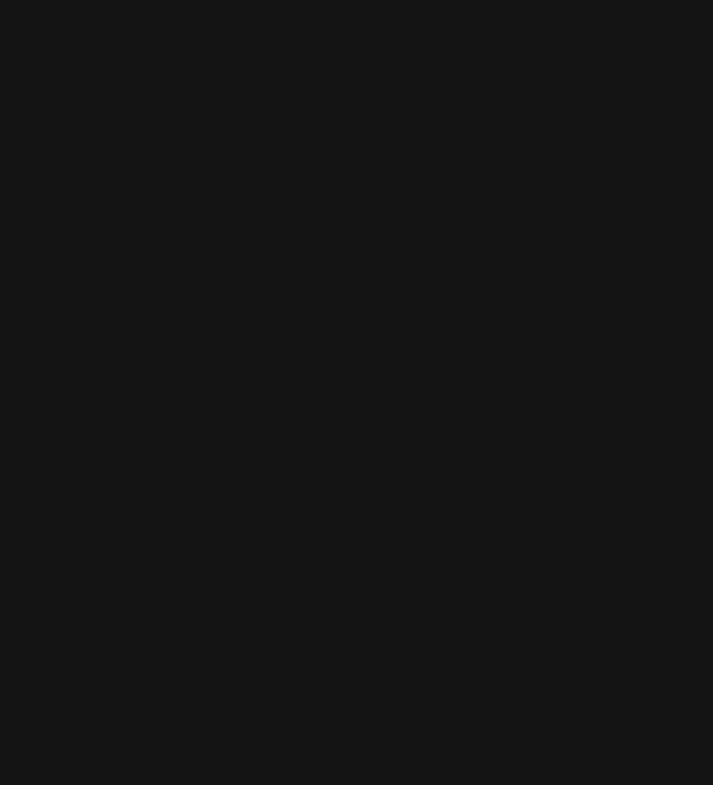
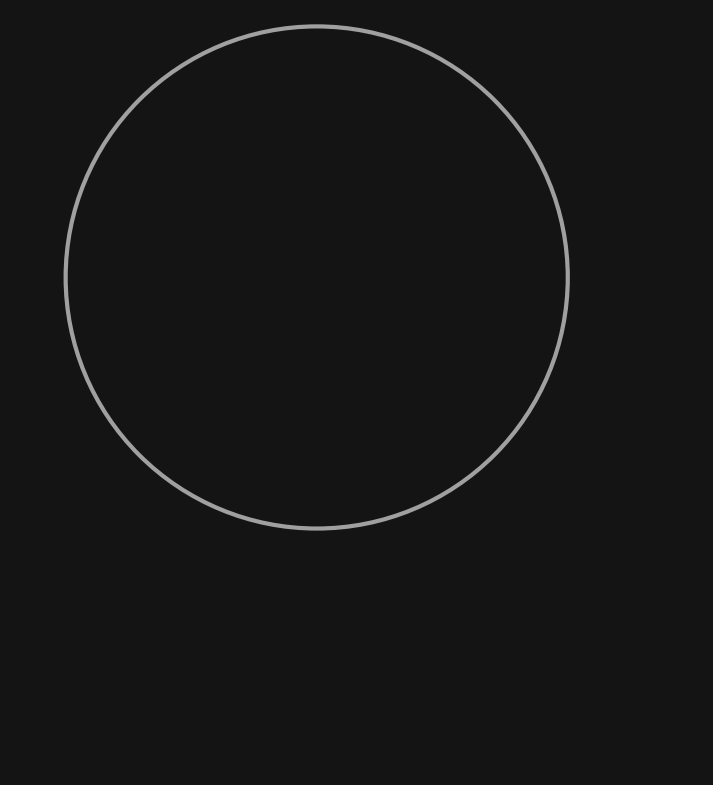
round board edge: none -> [63, 24, 570, 531]

